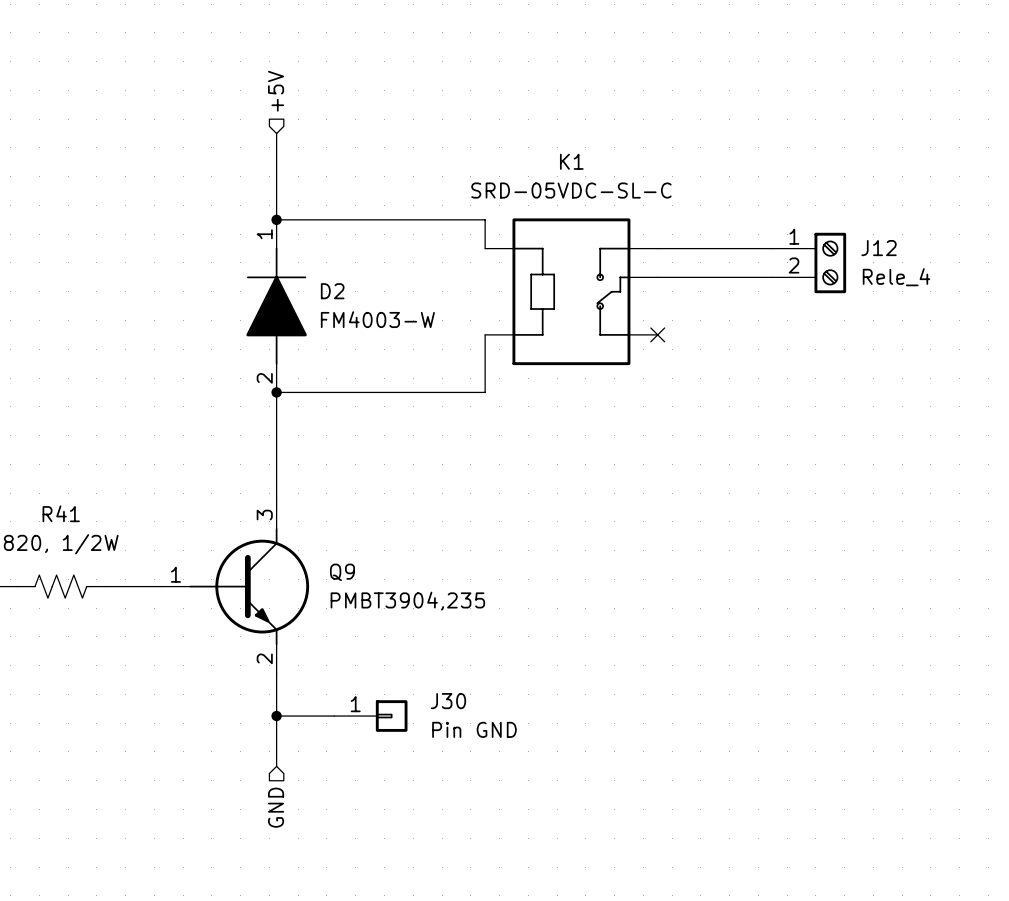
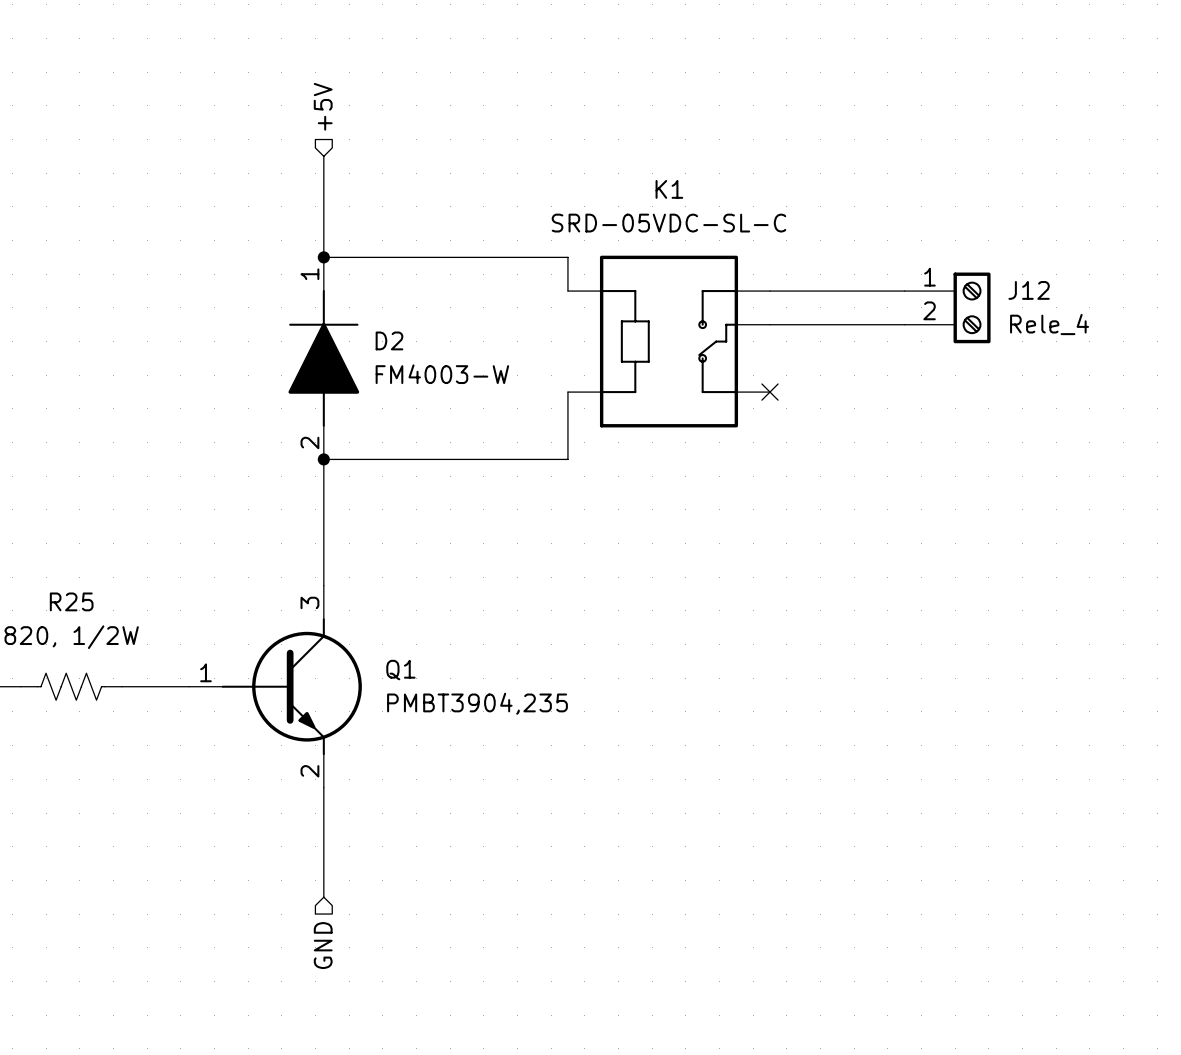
R41 name: R41 (61, 513) -> R25 (71, 601)
Q9 name: Q9 (342, 572) -> Q1 (400, 670)
wire: (276, 716) (334, 716) -> none
junction: (276, 716) -> none
J30: Pin GND (370, 716) -> none

